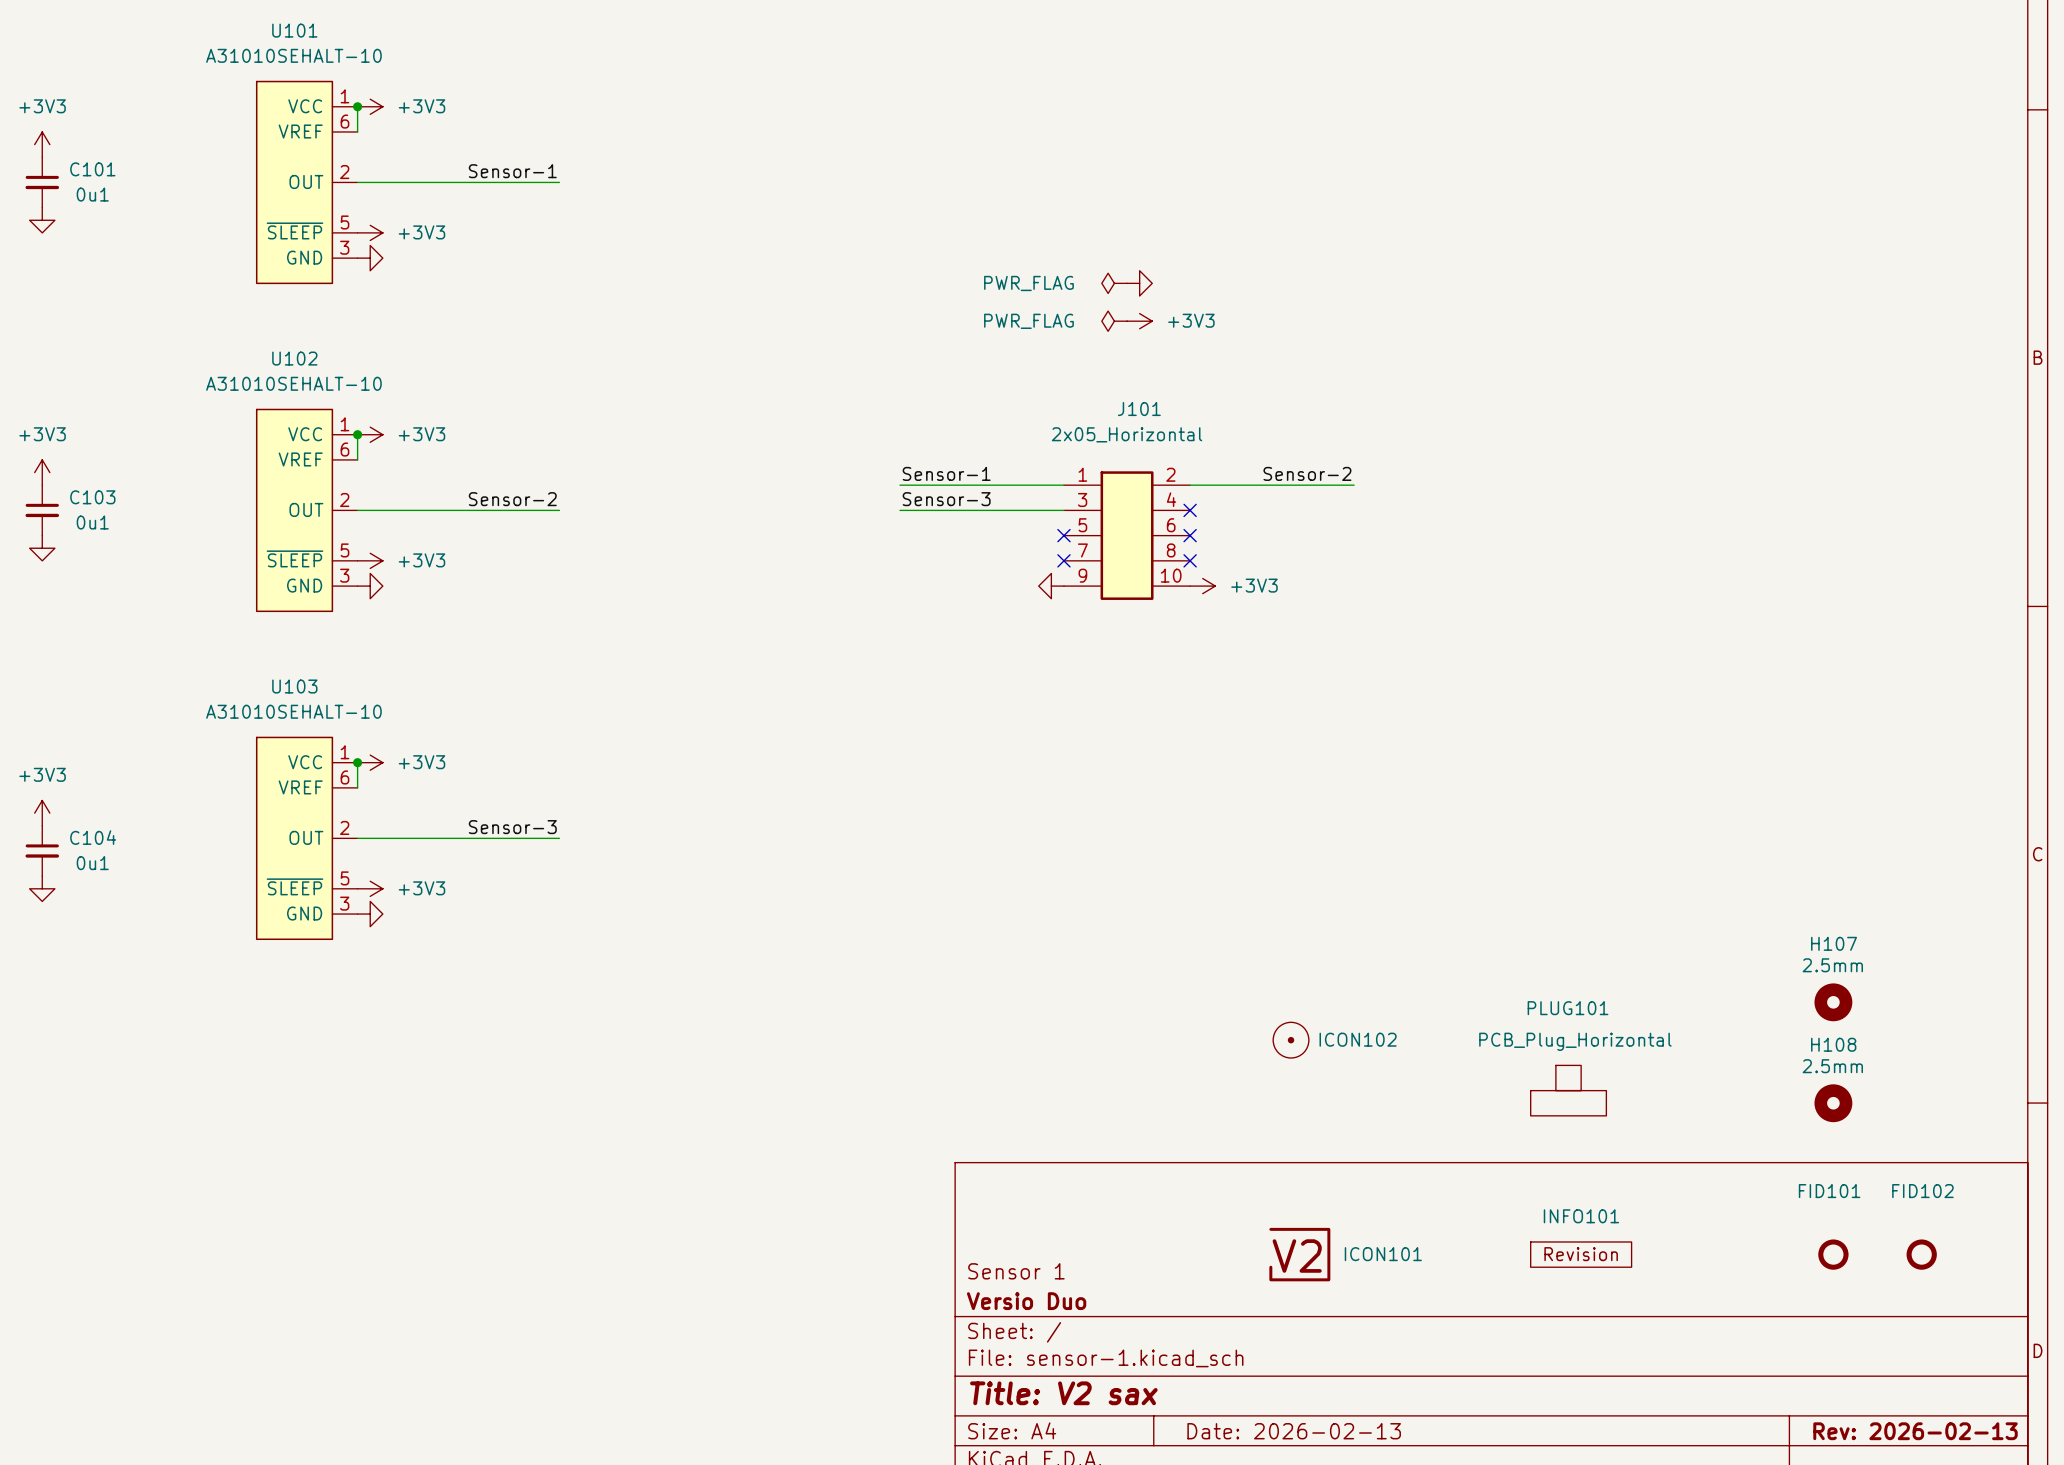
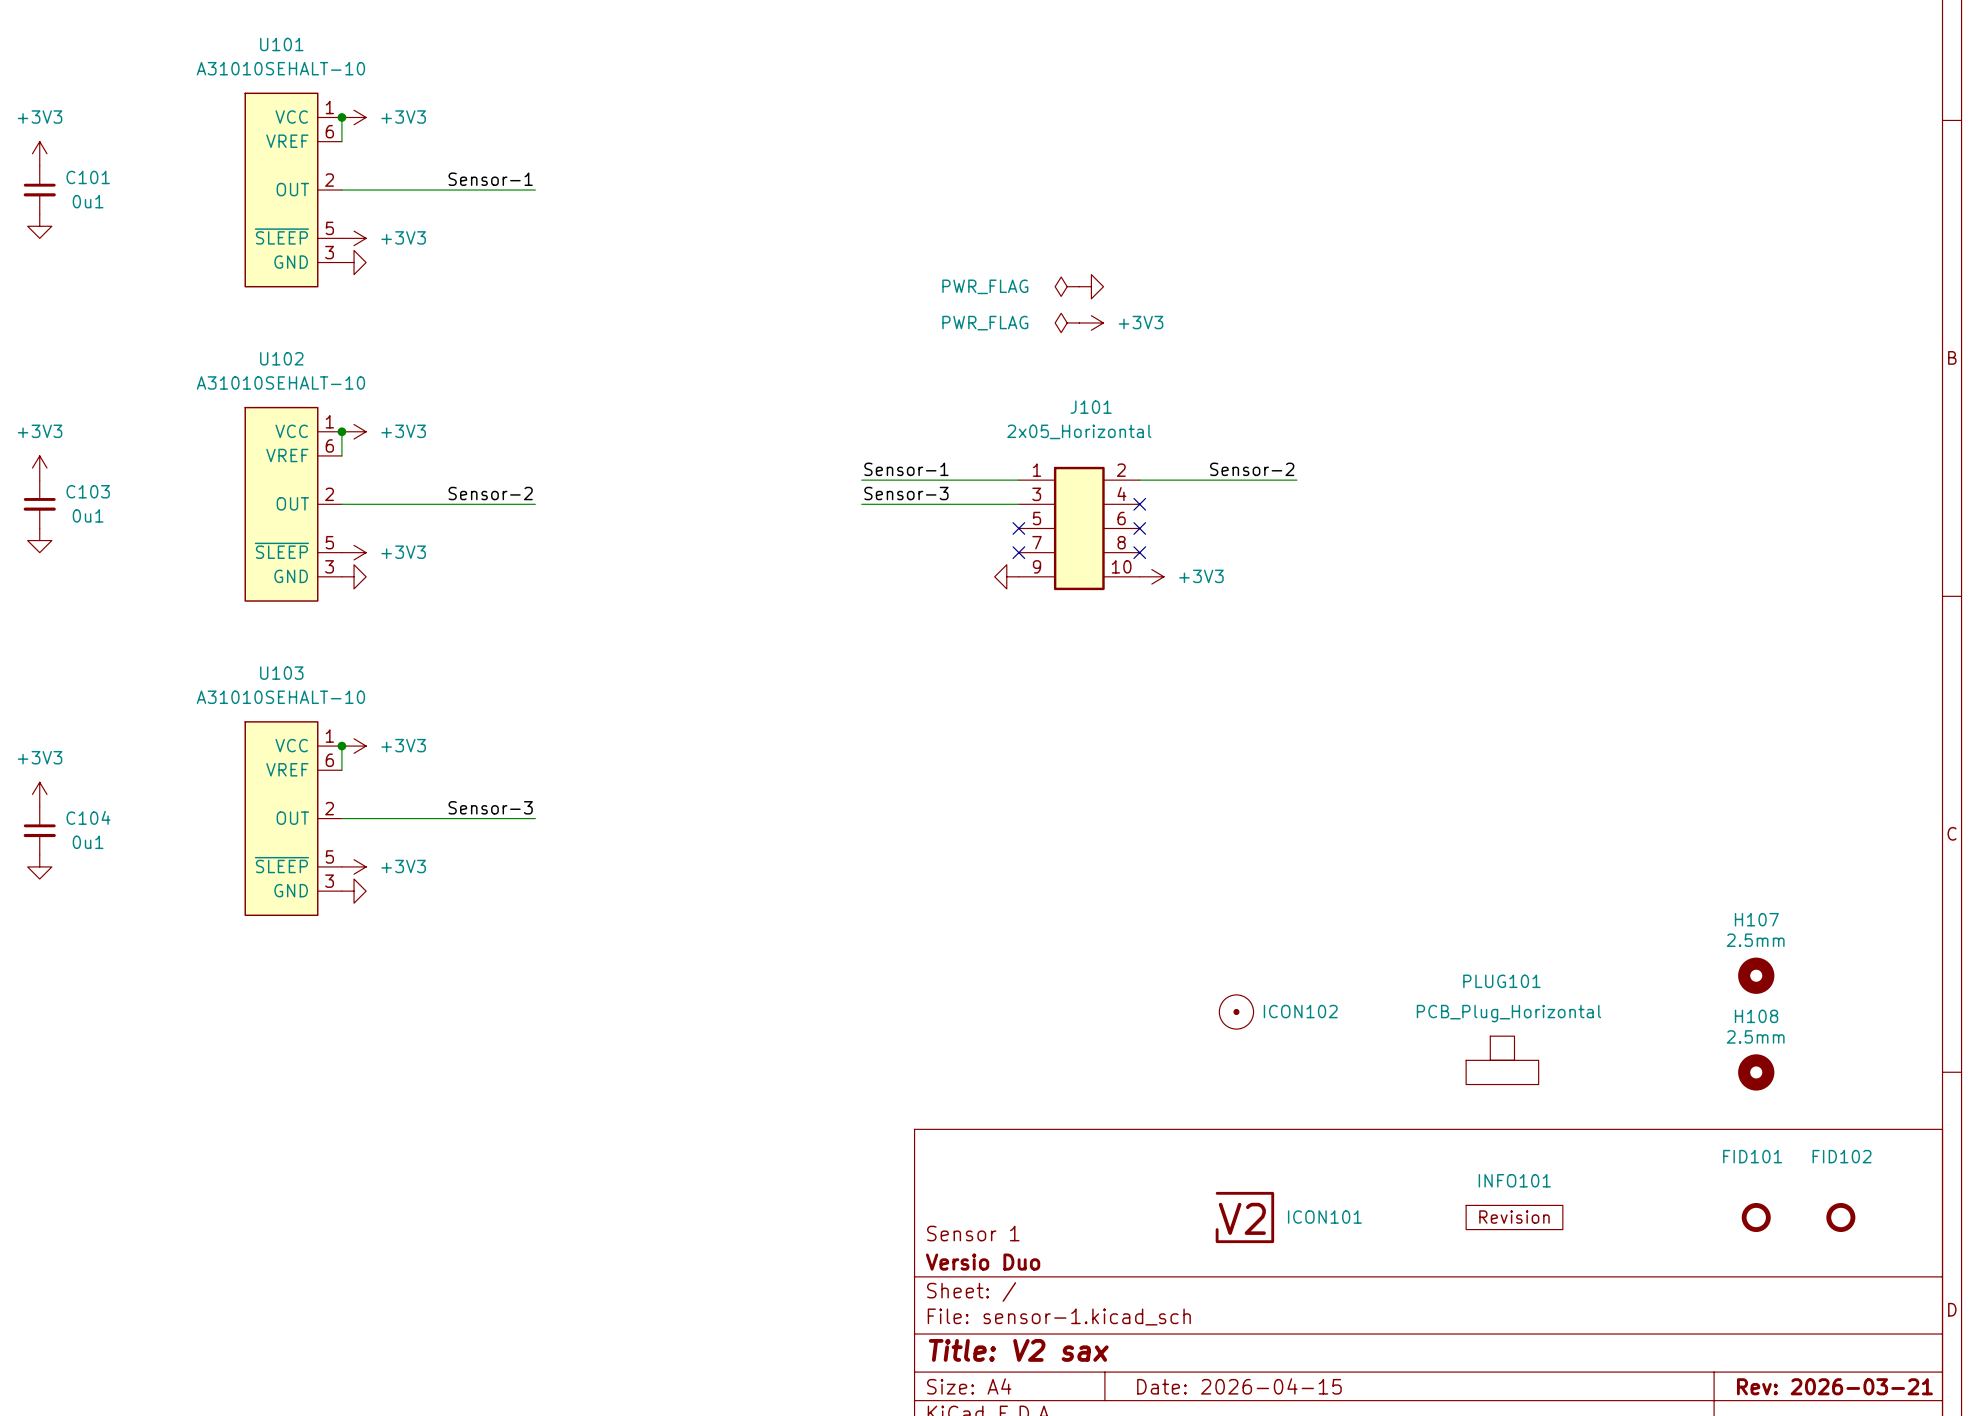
title block: Date: 2026-02-13 (1294, 1431) -> Date: 2026-04-15 (1239, 1386)
title block: Rev: 2026-02-13 (1915, 1431) -> Rev: 2026-03-21 (1834, 1386)

